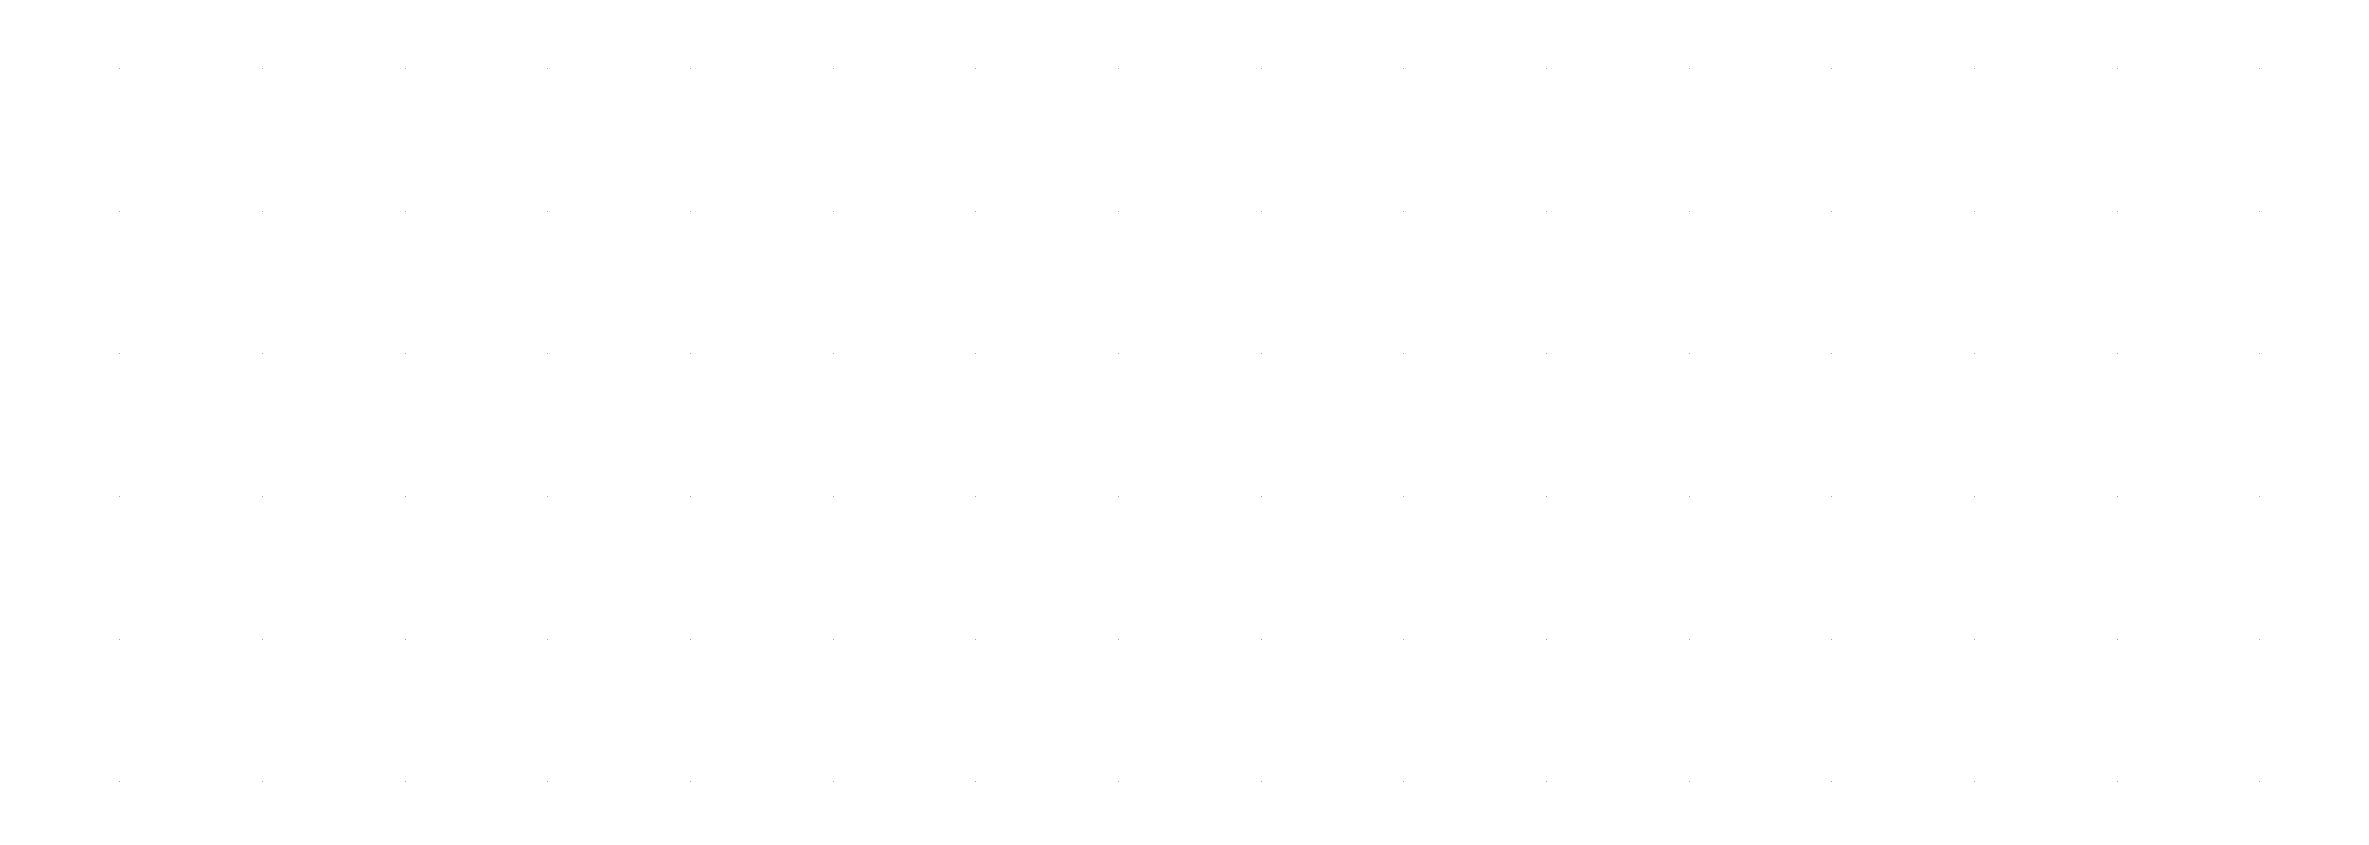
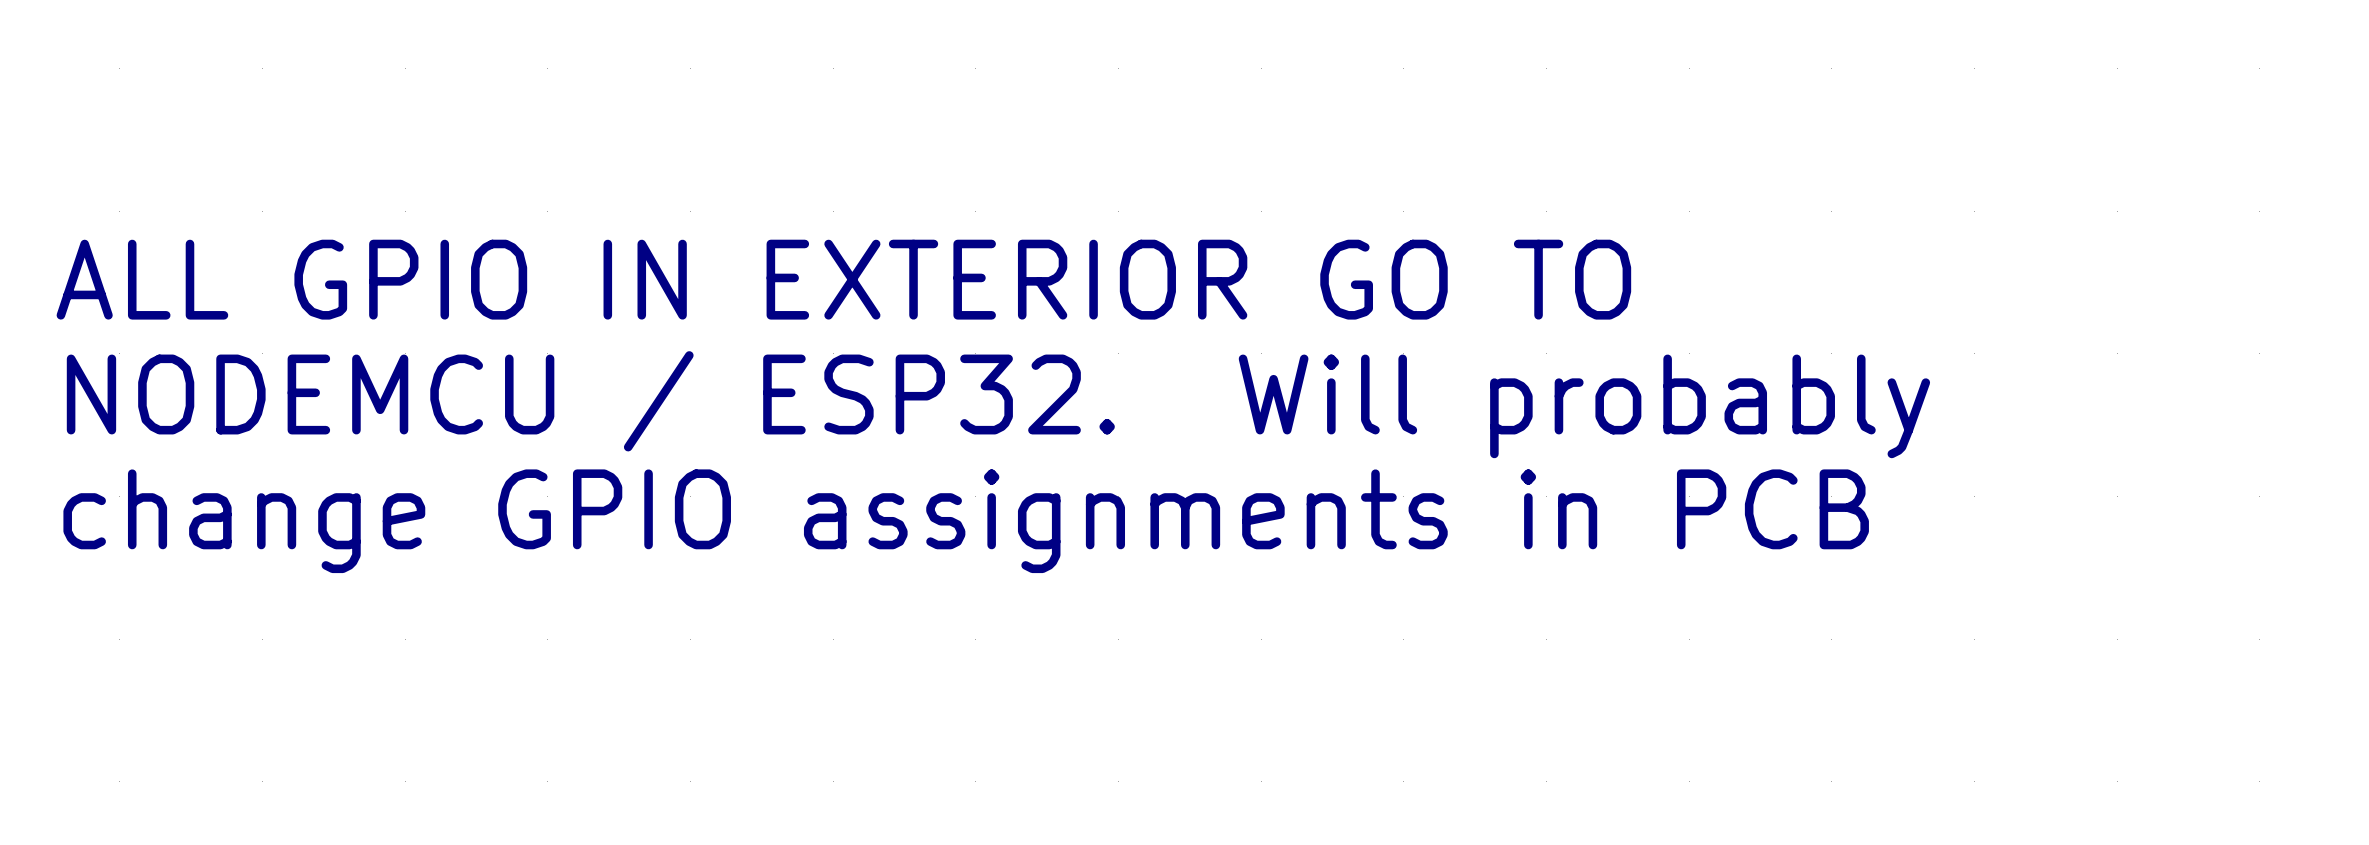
text: none -> ALL GPIO IN EXTERIOR GO TO (843, 279)
text: none -> NODEMCU / ESP32. Will probably (998, 404)
text: none -> change GPIO assignments in PCB (966, 521)

